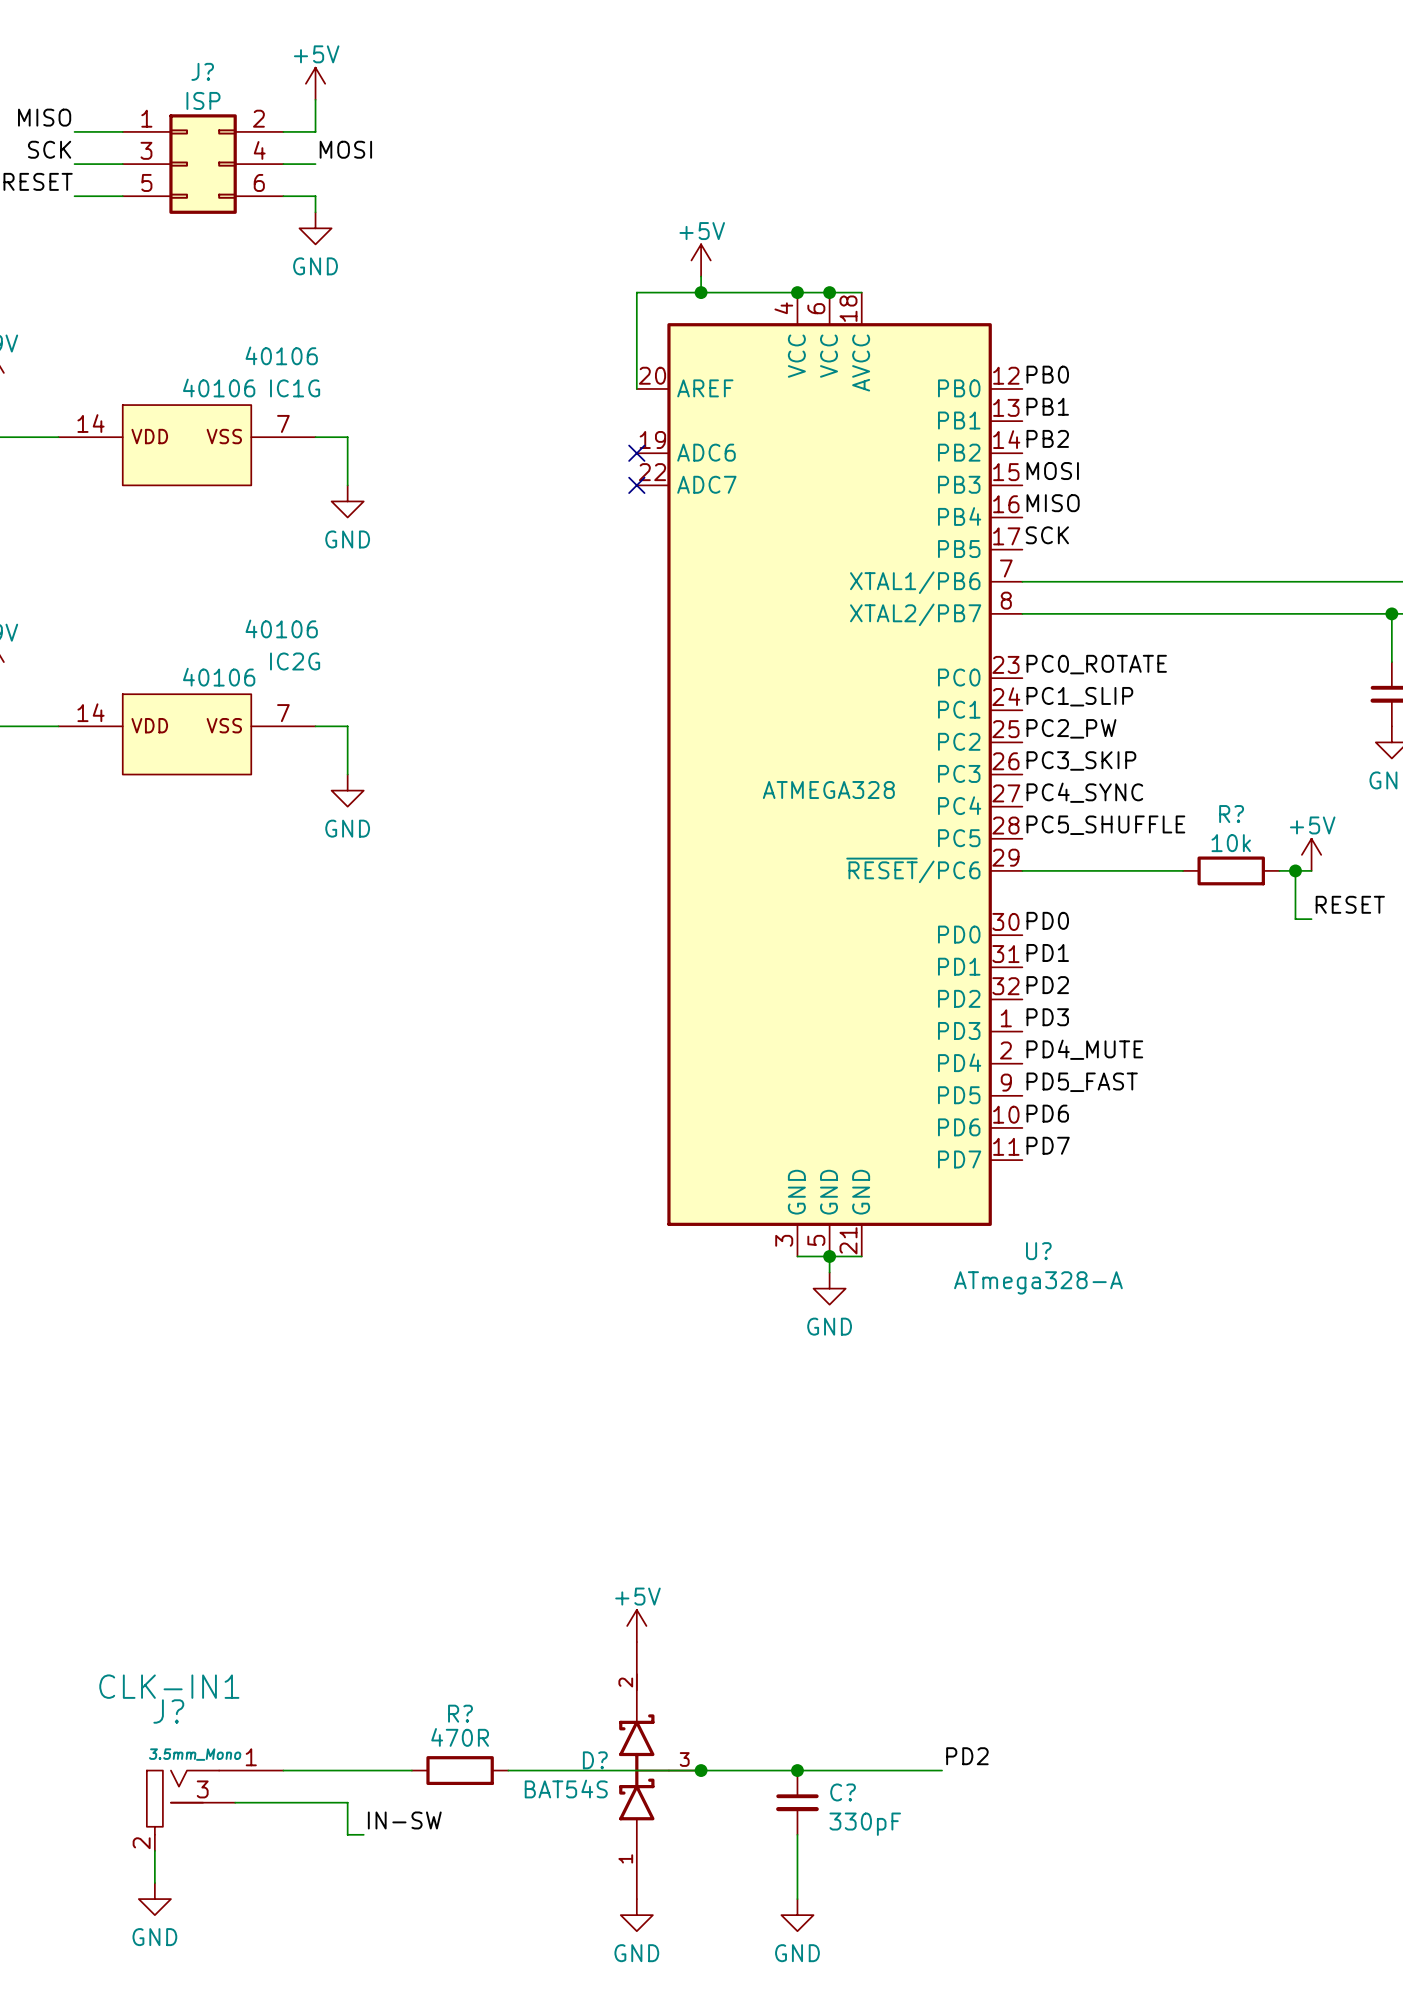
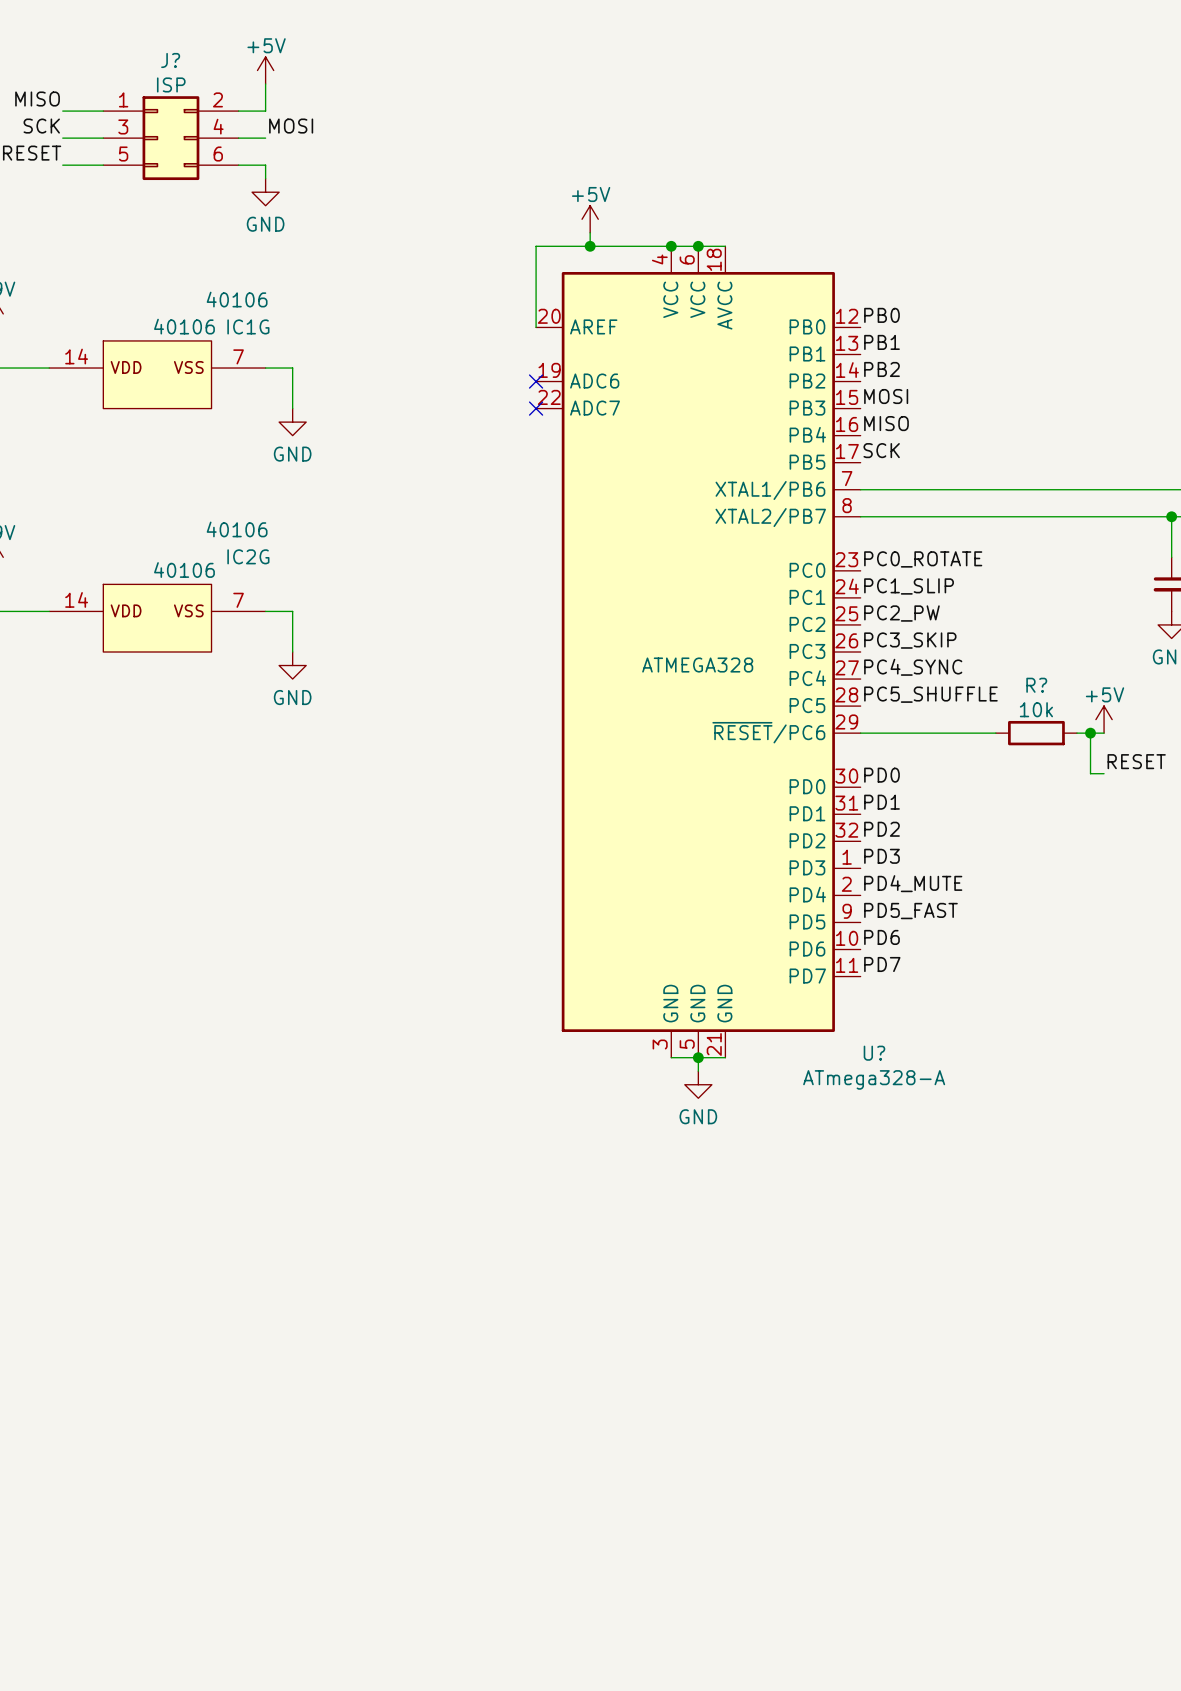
power symbol: +5V (636, 1625) -> none
label: PD2 (967, 1756) -> none
wire: (283, 1770) (411, 1770) -> none
R?: (460, 1770) -> none
wire: (508, 1770) (942, 1770) -> none
D?: BAT54S (660, 1770) -> none
junction: (701, 1770) -> none
junction: (797, 1770) -> none
wire: (235, 1802) (347, 1802) (347, 1834) (363, 1834) -> none
C?: (797, 1802) -> none
J?: CLK-IN1 (215, 1810) -> none
label: IN-SW (404, 1820) -> none
wire: (797, 1834) (797, 1899) -> none
wire: (154, 1850) (154, 1883) -> none
power symbol: GND (154, 1899) -> none
power symbol: GND (636, 1915) -> none
power symbol: GND (797, 1915) -> none

